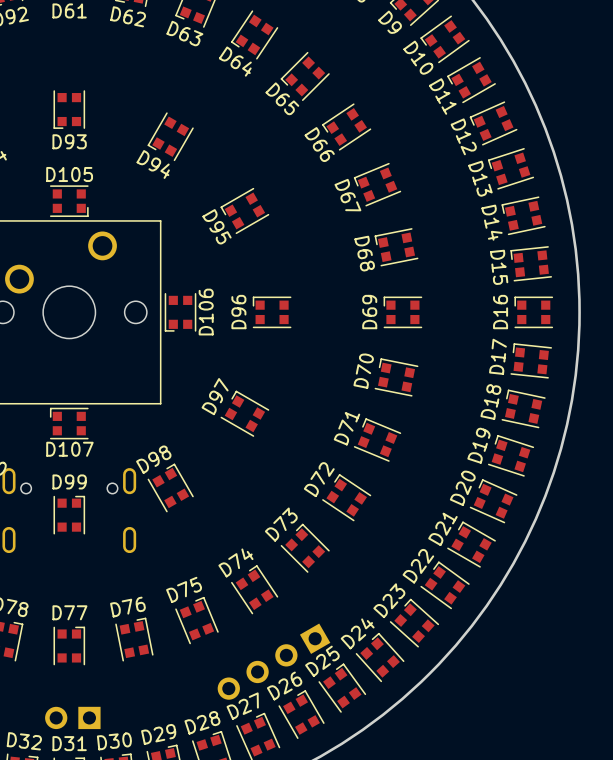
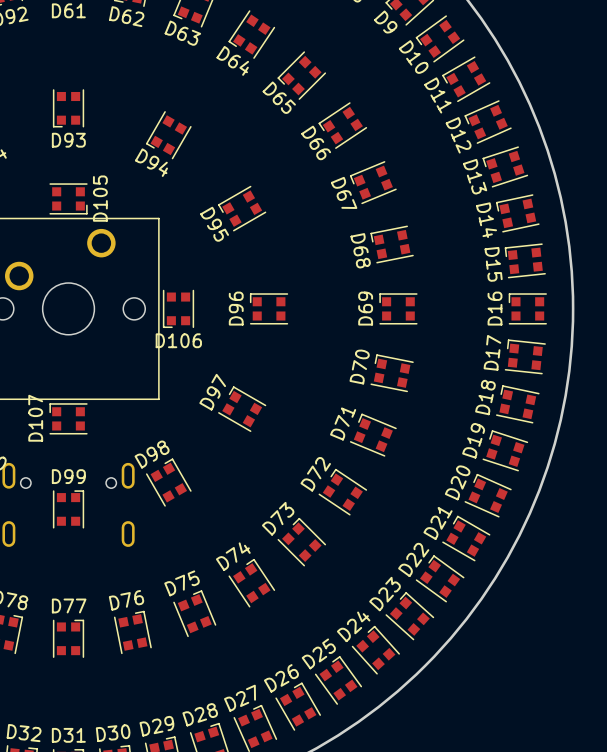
D105 name rotation: 0° (69, 174) -> 90° counterclockwise (100, 198)
D106 name rotation: 0° (206, 312) -> 90° clockwise (178, 340)
D107 name rotation: 0° (69, 449) -> 90° counterclockwise (35, 418)
part: (274, 661) -> none
part: (72, 717) -> none

